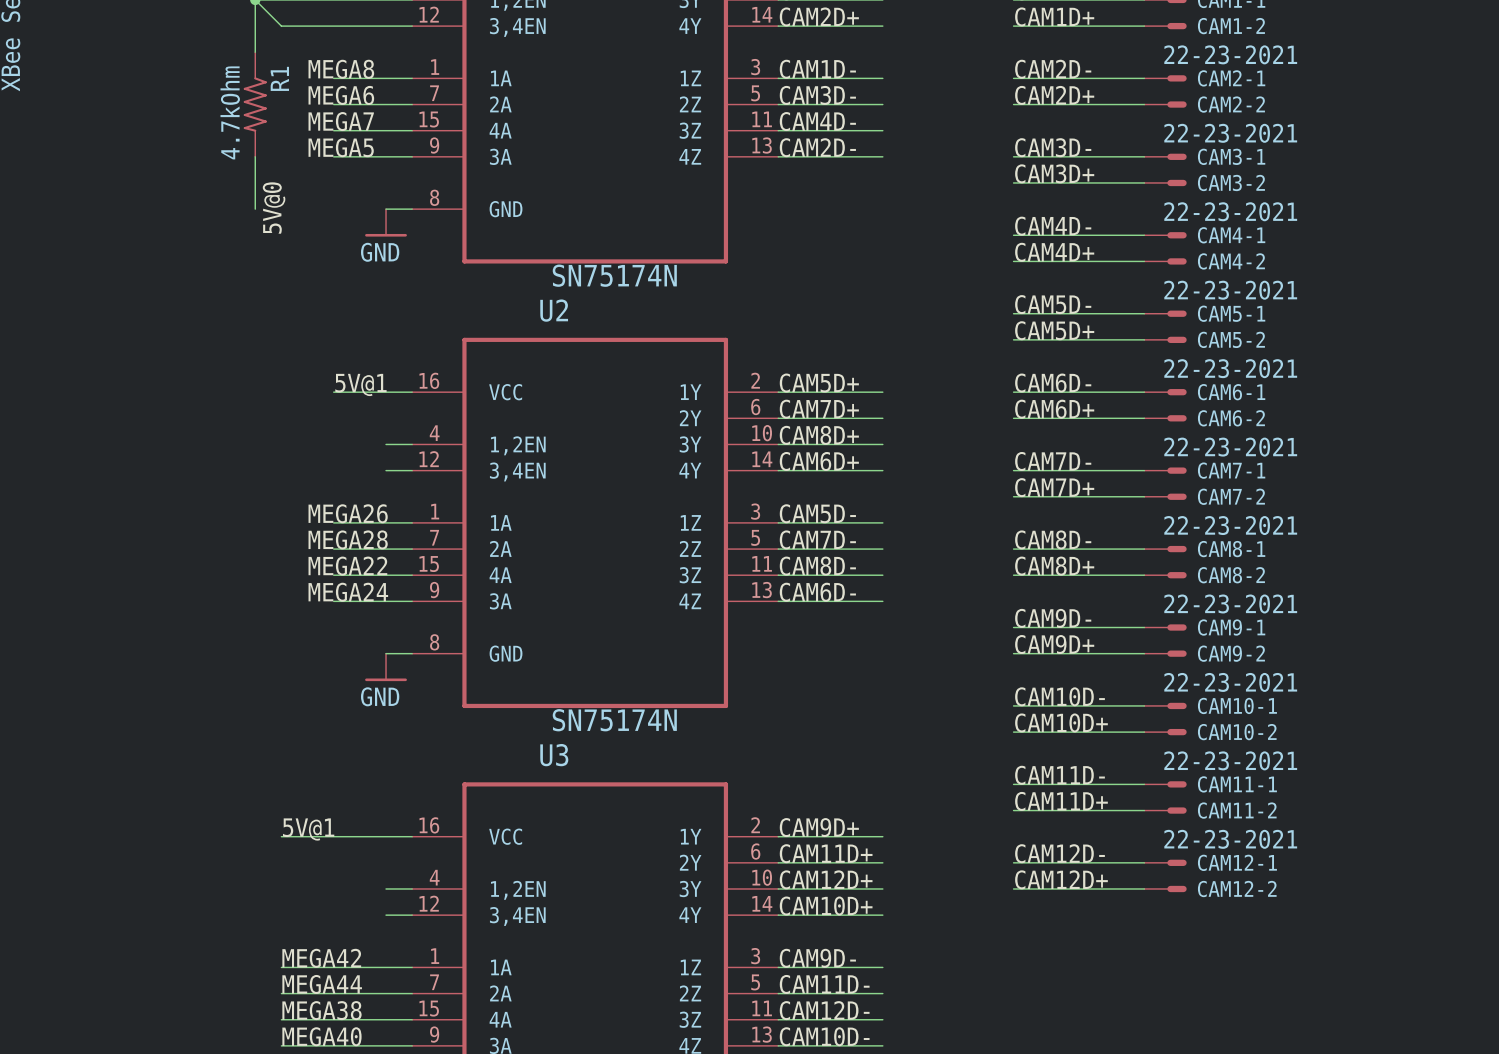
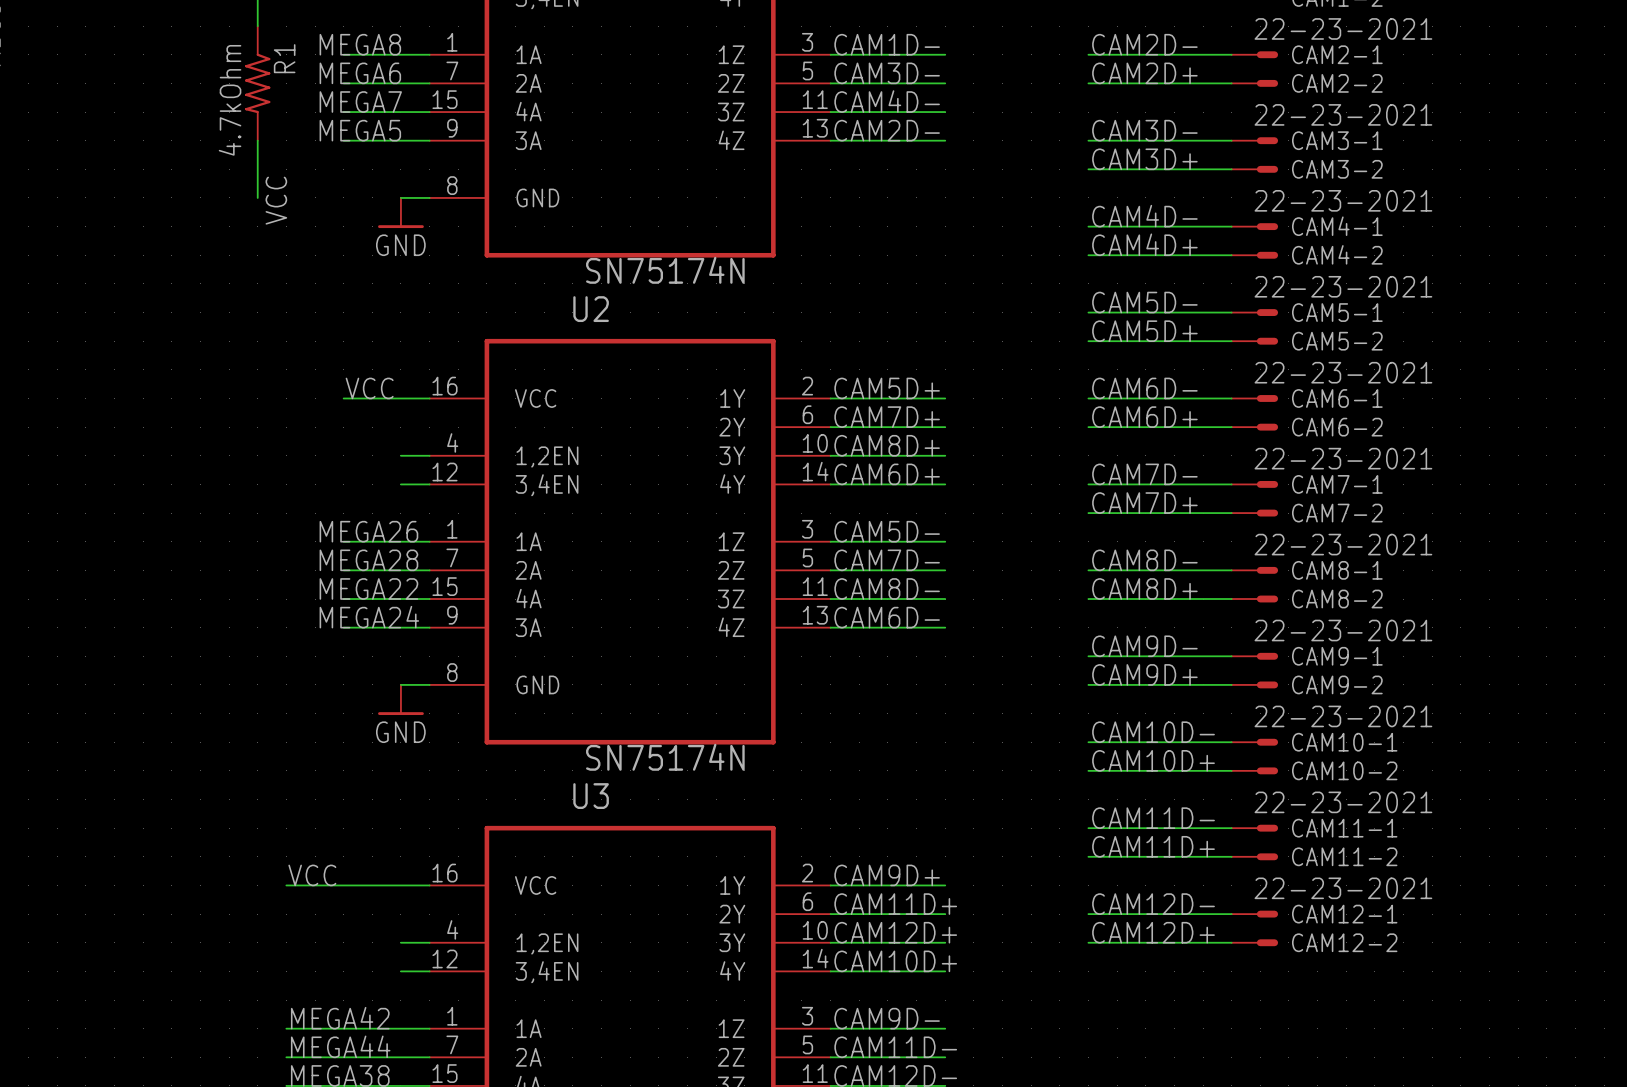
label: 5V@0 (274, 208) -> VCC (276, 200)
label: 5V@1 (360, 384) -> VCC (369, 388)
label: 5V@1 (308, 829) -> VCC (312, 875)

